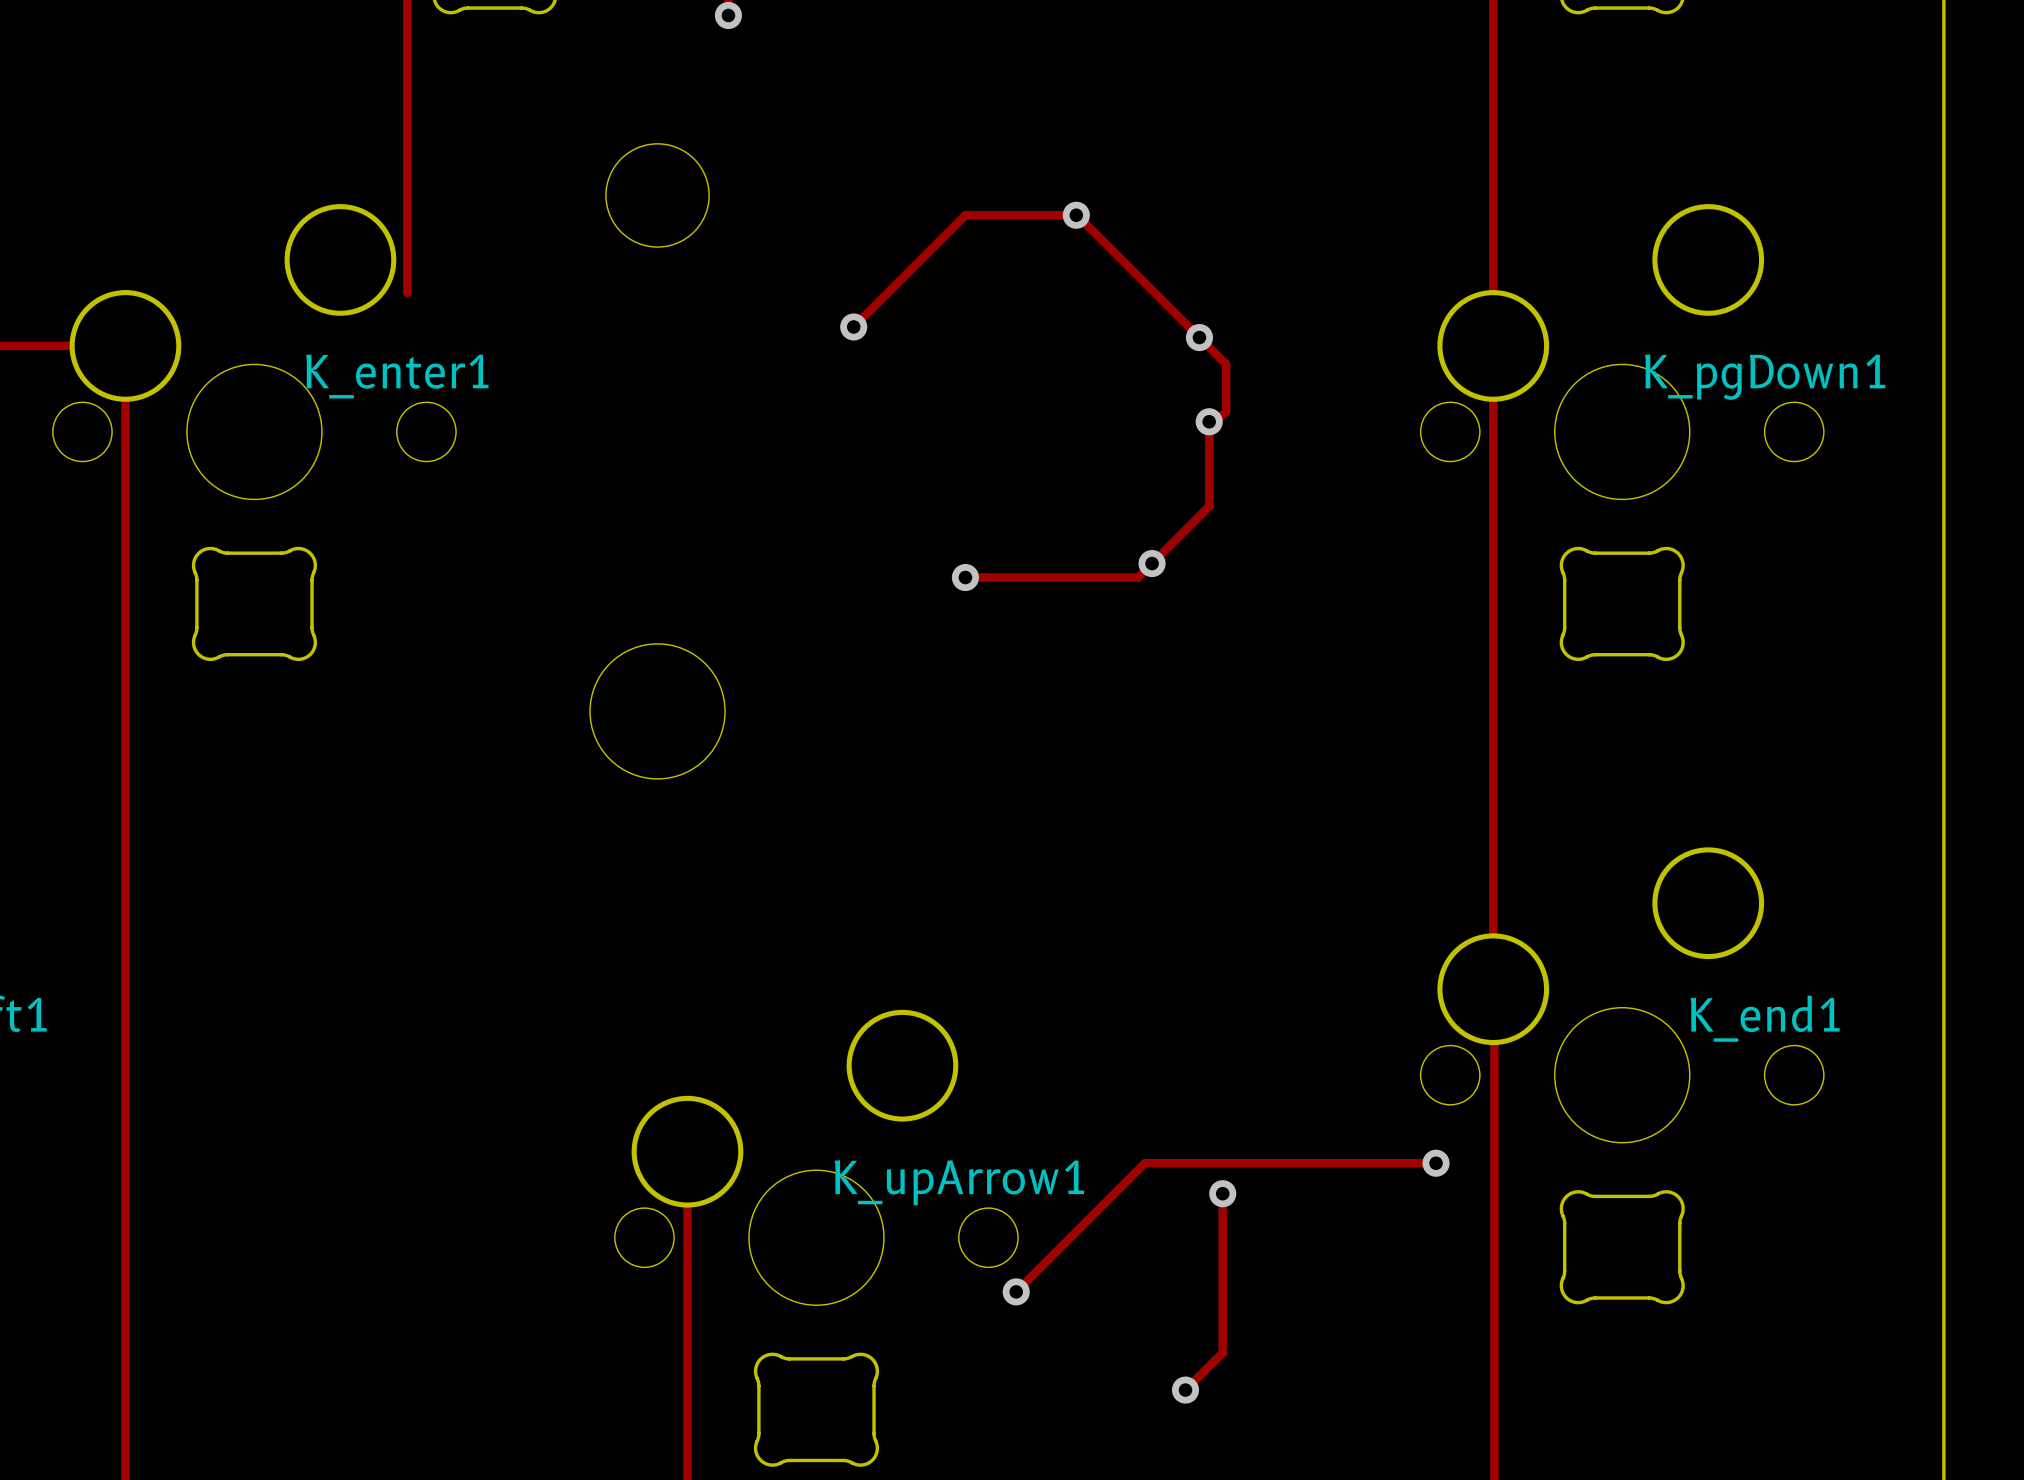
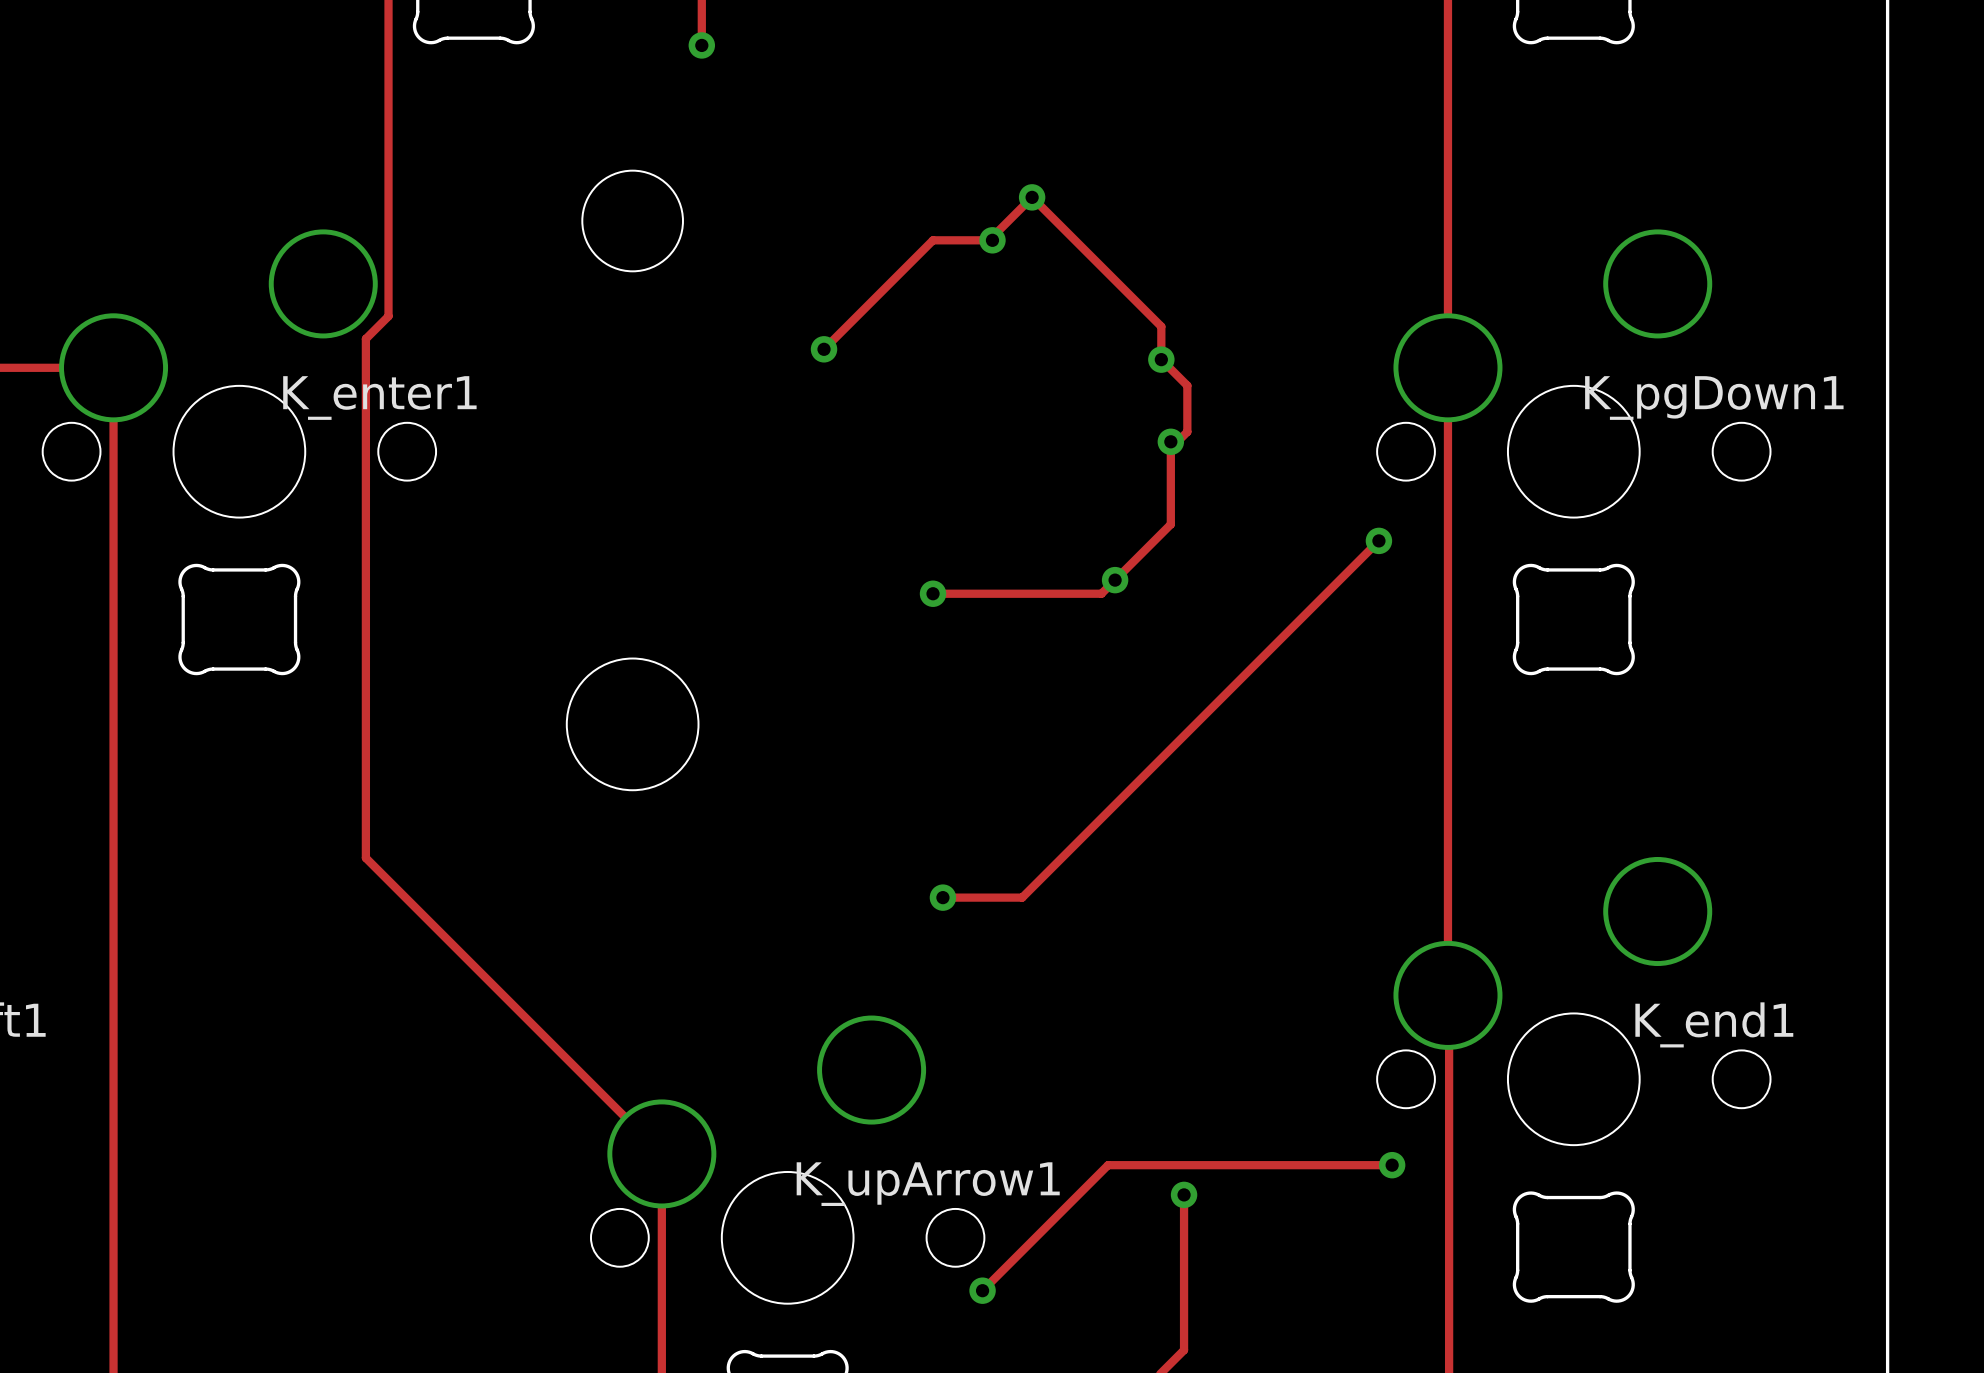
via: none -> (1032, 197)
track: (1026, 215) (1077, 215) (1199, 337) -> (992, 240) (992, 237) (1032, 197) (1161, 326) (1161, 359)
via: none -> (992, 240)
via: (1076, 215) -> none
track: none -> (388, 316) (365, 338) (365, 857) (661, 1153)
track: none -> (1378, 540) (1022, 897) (942, 897)
via: none -> (1378, 540)
via: none -> (942, 897)

